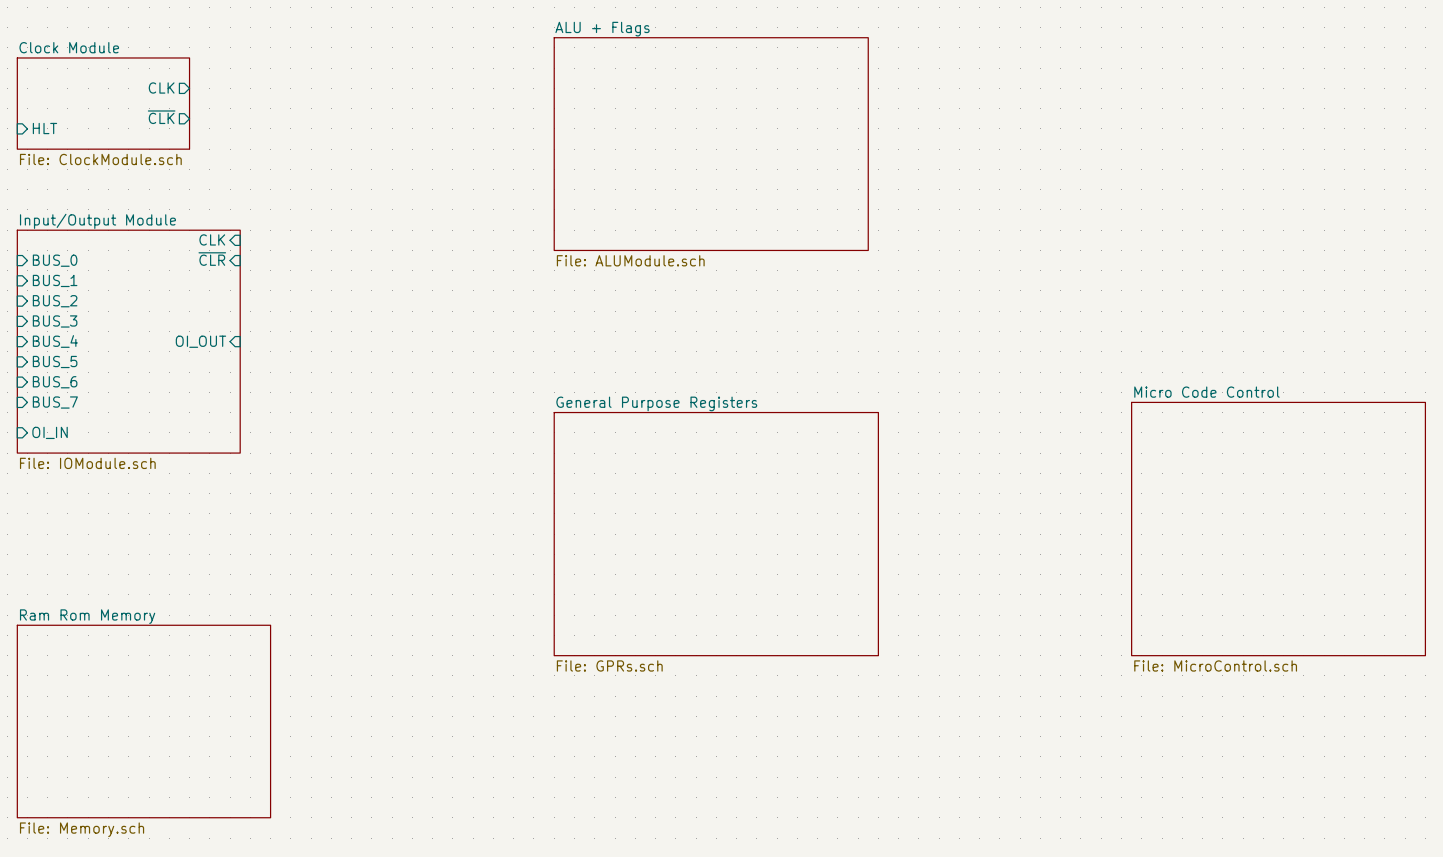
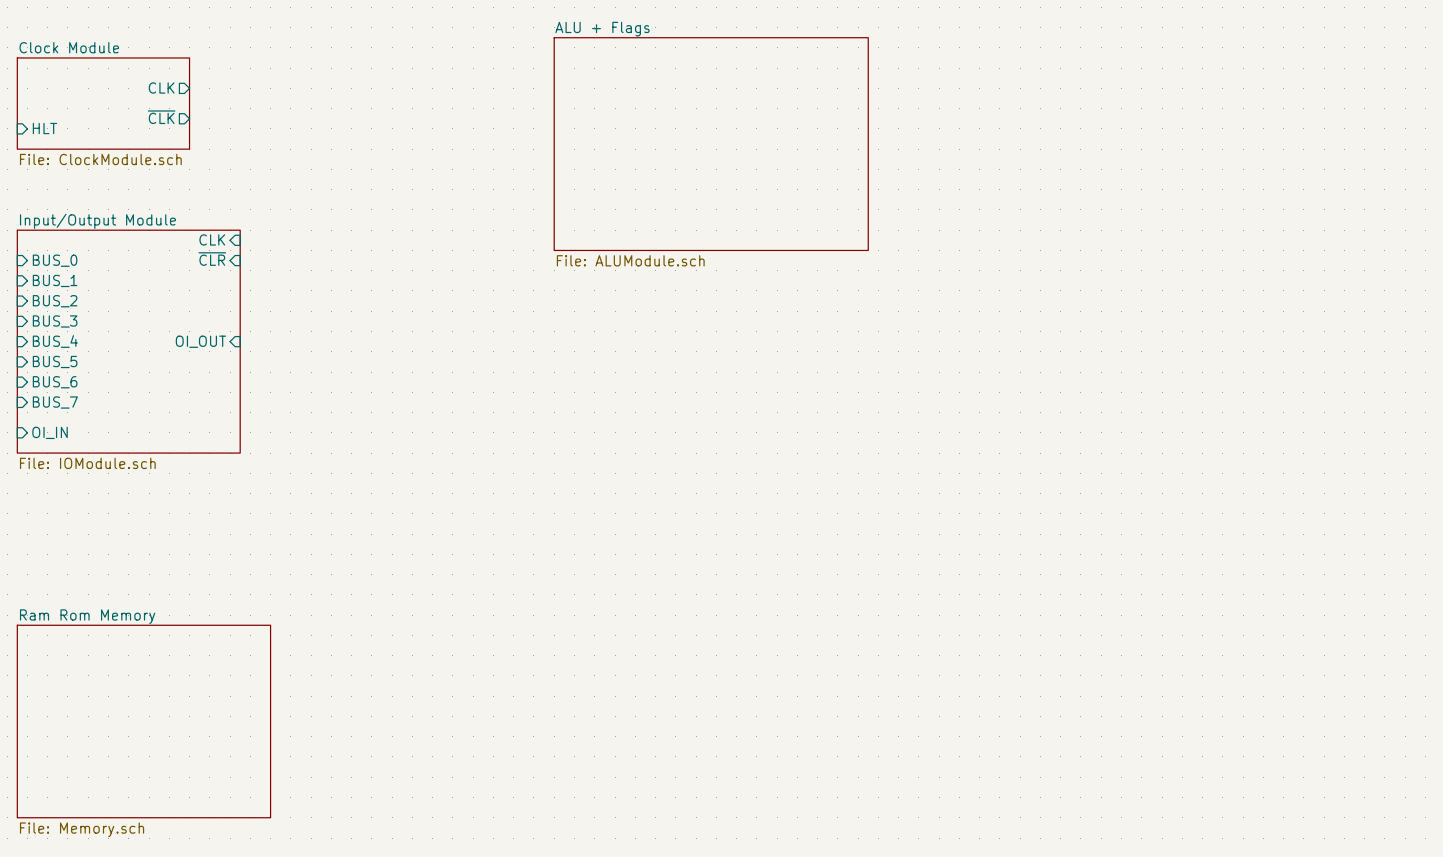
sheet Micro Code Control: File: MicroControl.sch (1278, 529) -> none
sheet General Purpose Registers: File: GPRs.sch (716, 534) -> none

